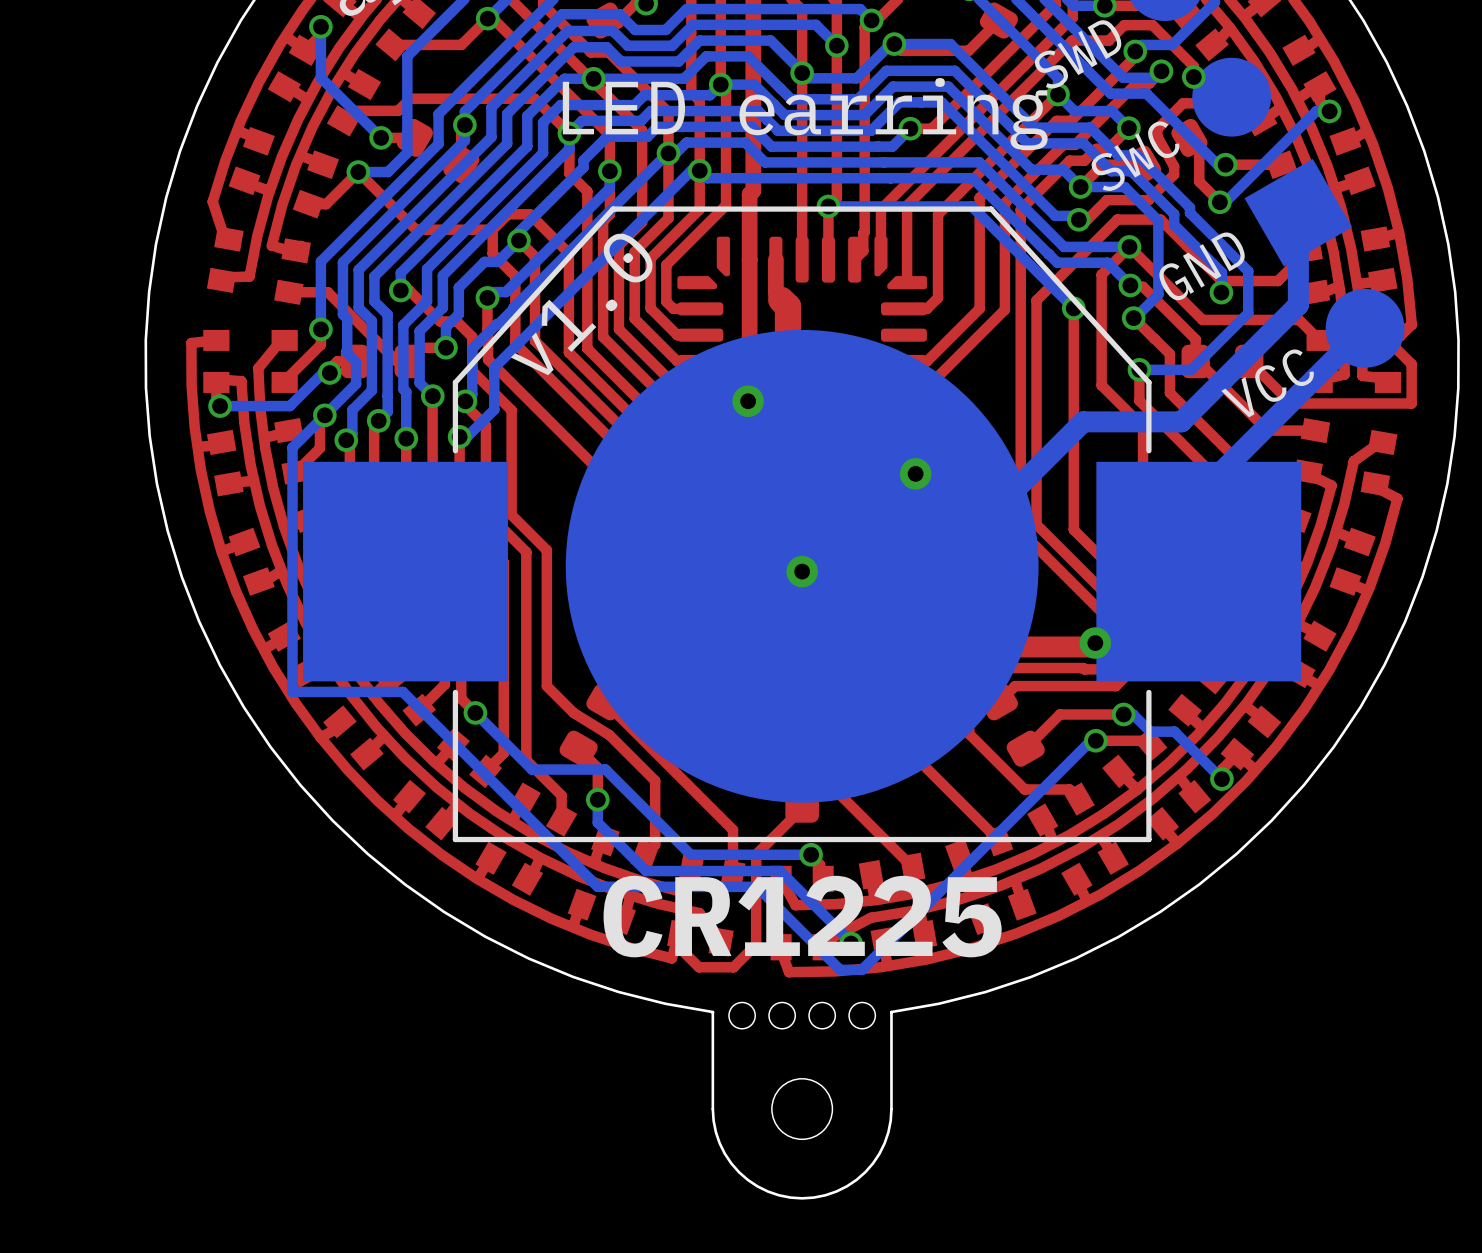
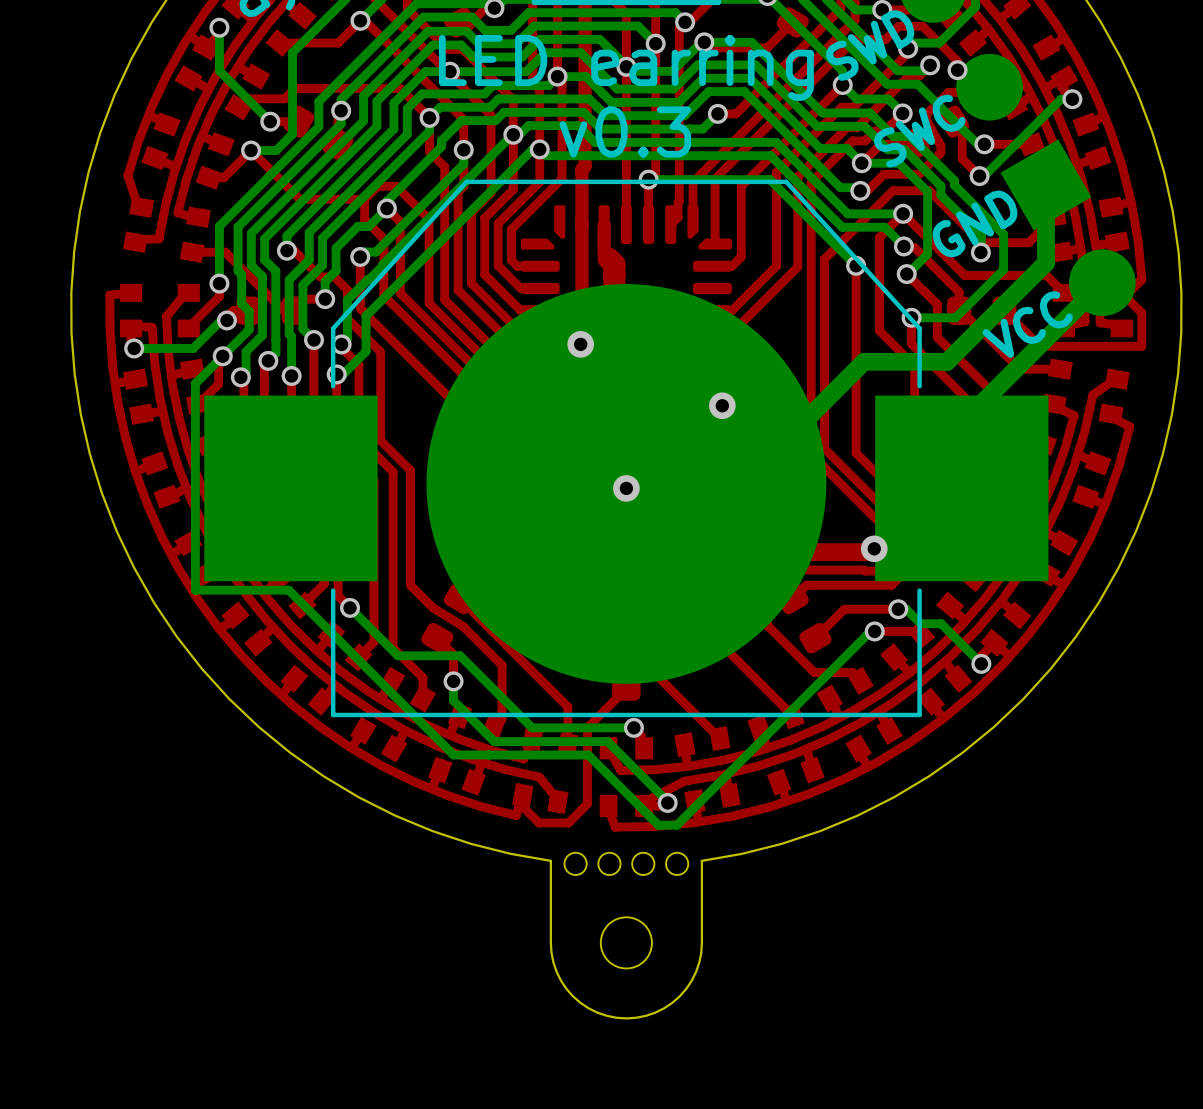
text position: LED earring (805, 114) -> LED earring (626, 67)
text: none -> v0.3 (625, 132)
text: v1.0 (581, 304) -> none
text: CR1225 (802, 916) -> none

